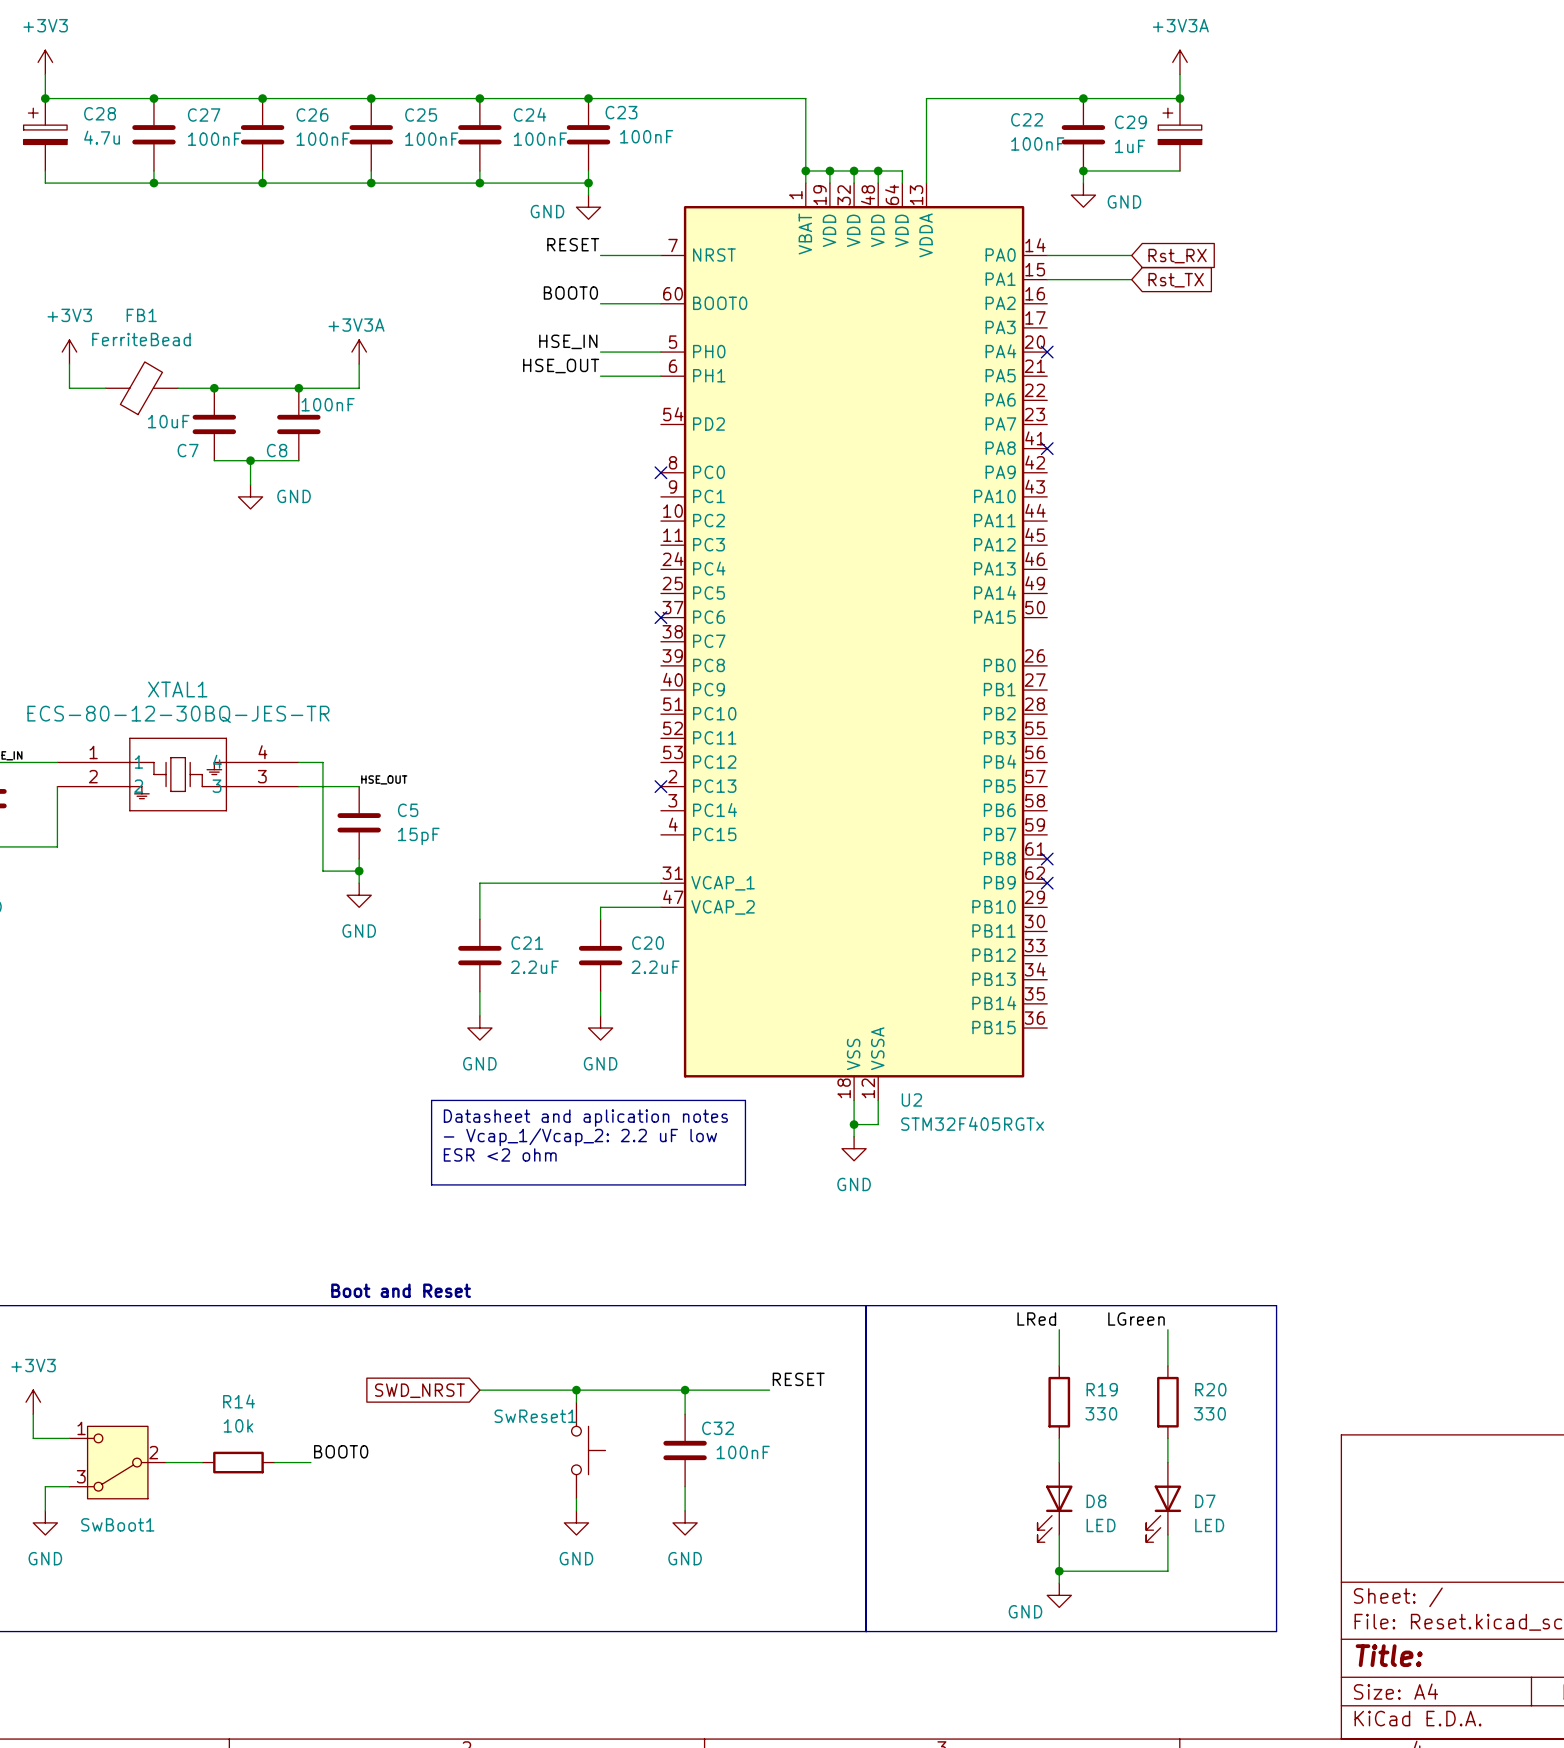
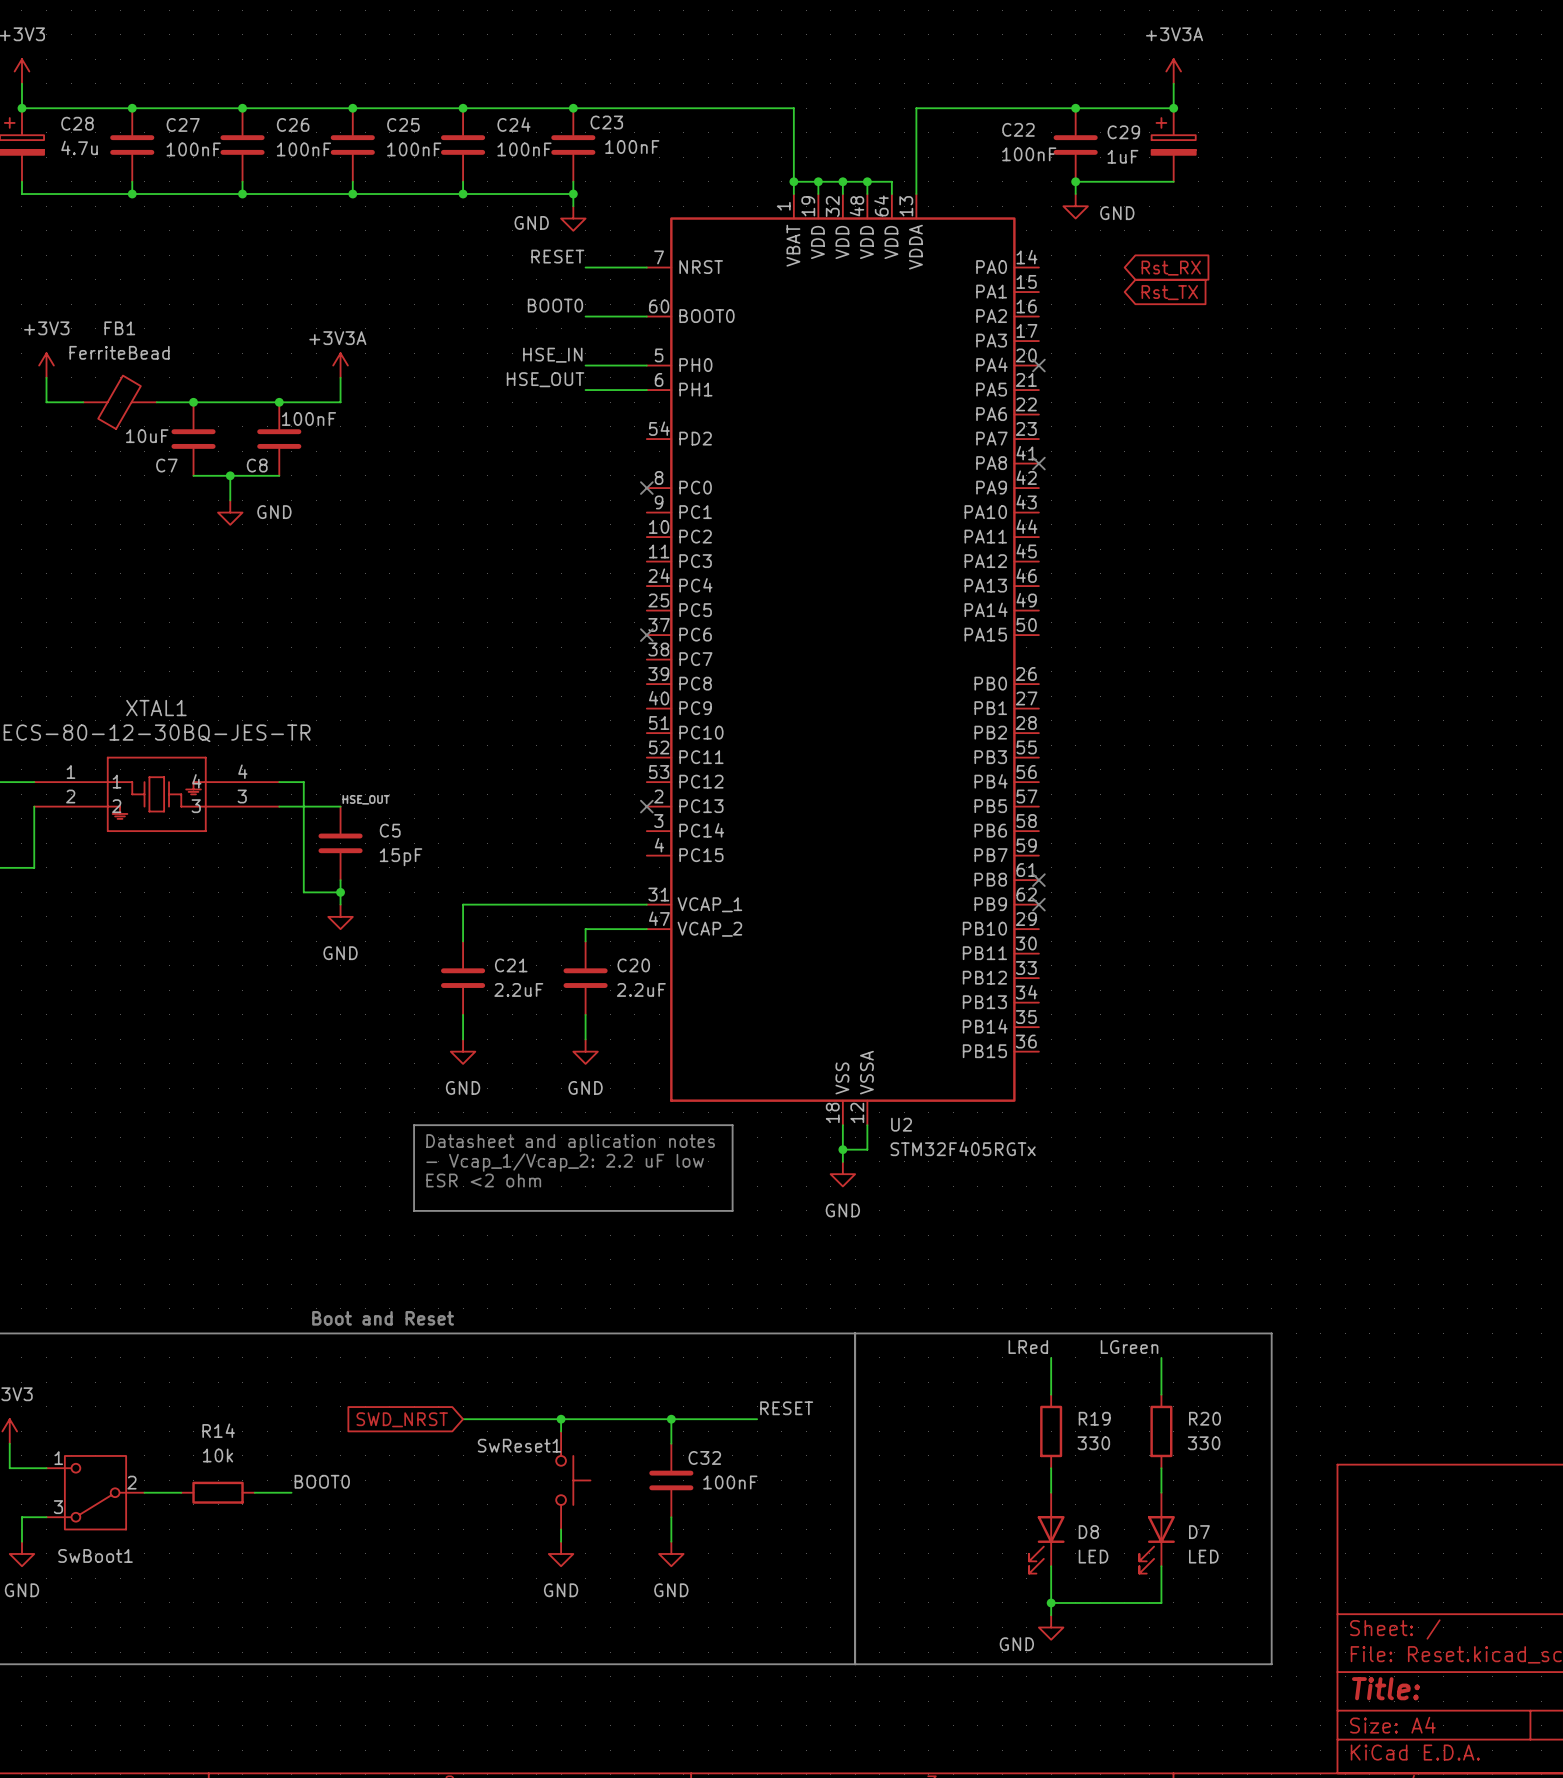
wire: (1047, 255) (1131, 255) -> none
wire: (1047, 279) (1131, 279) -> none

